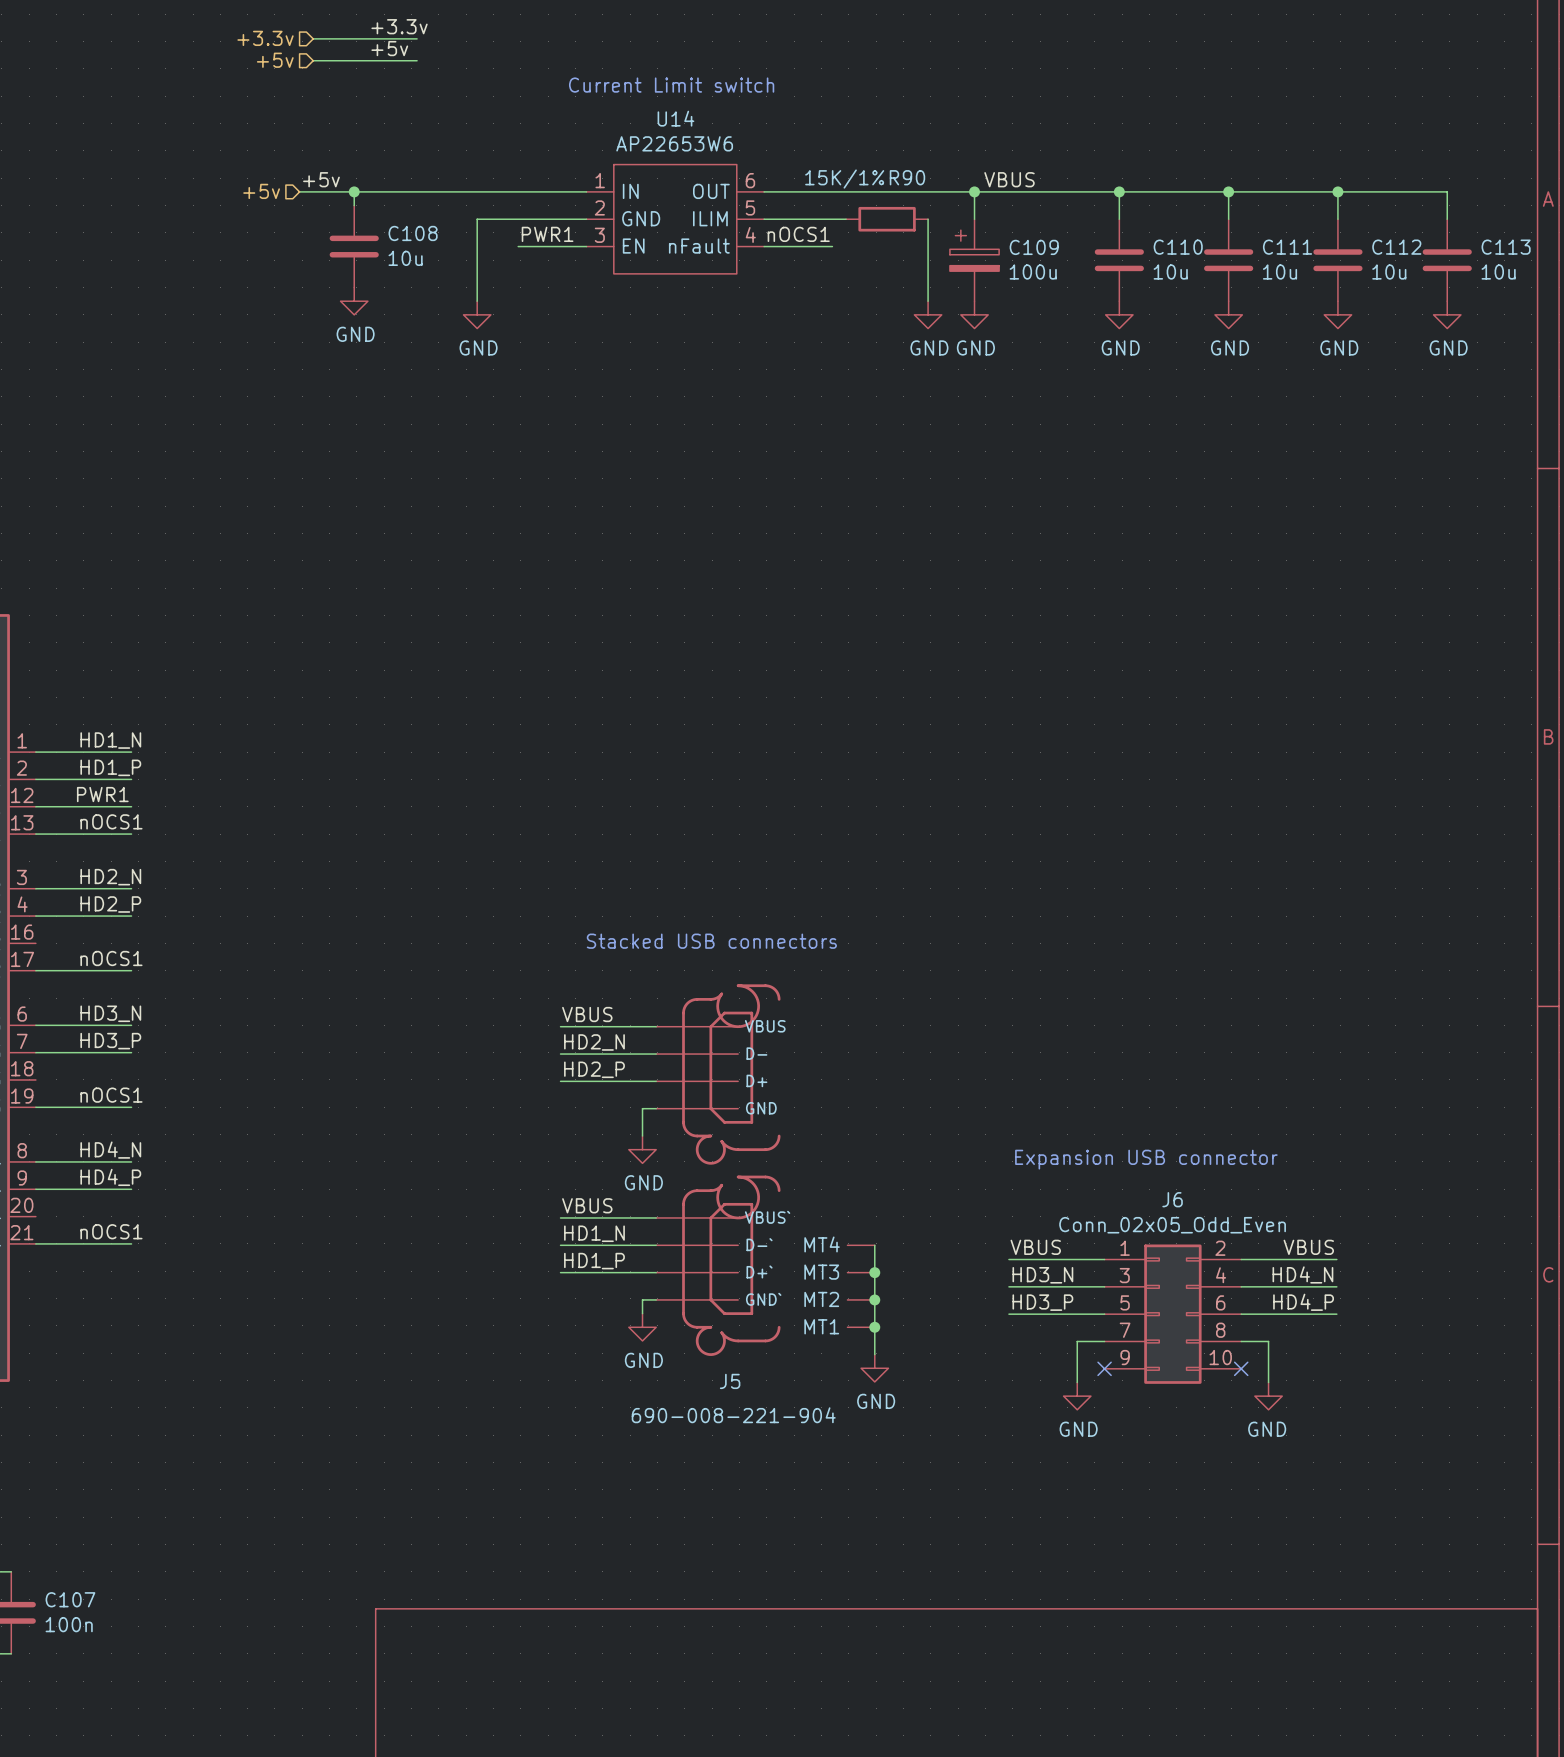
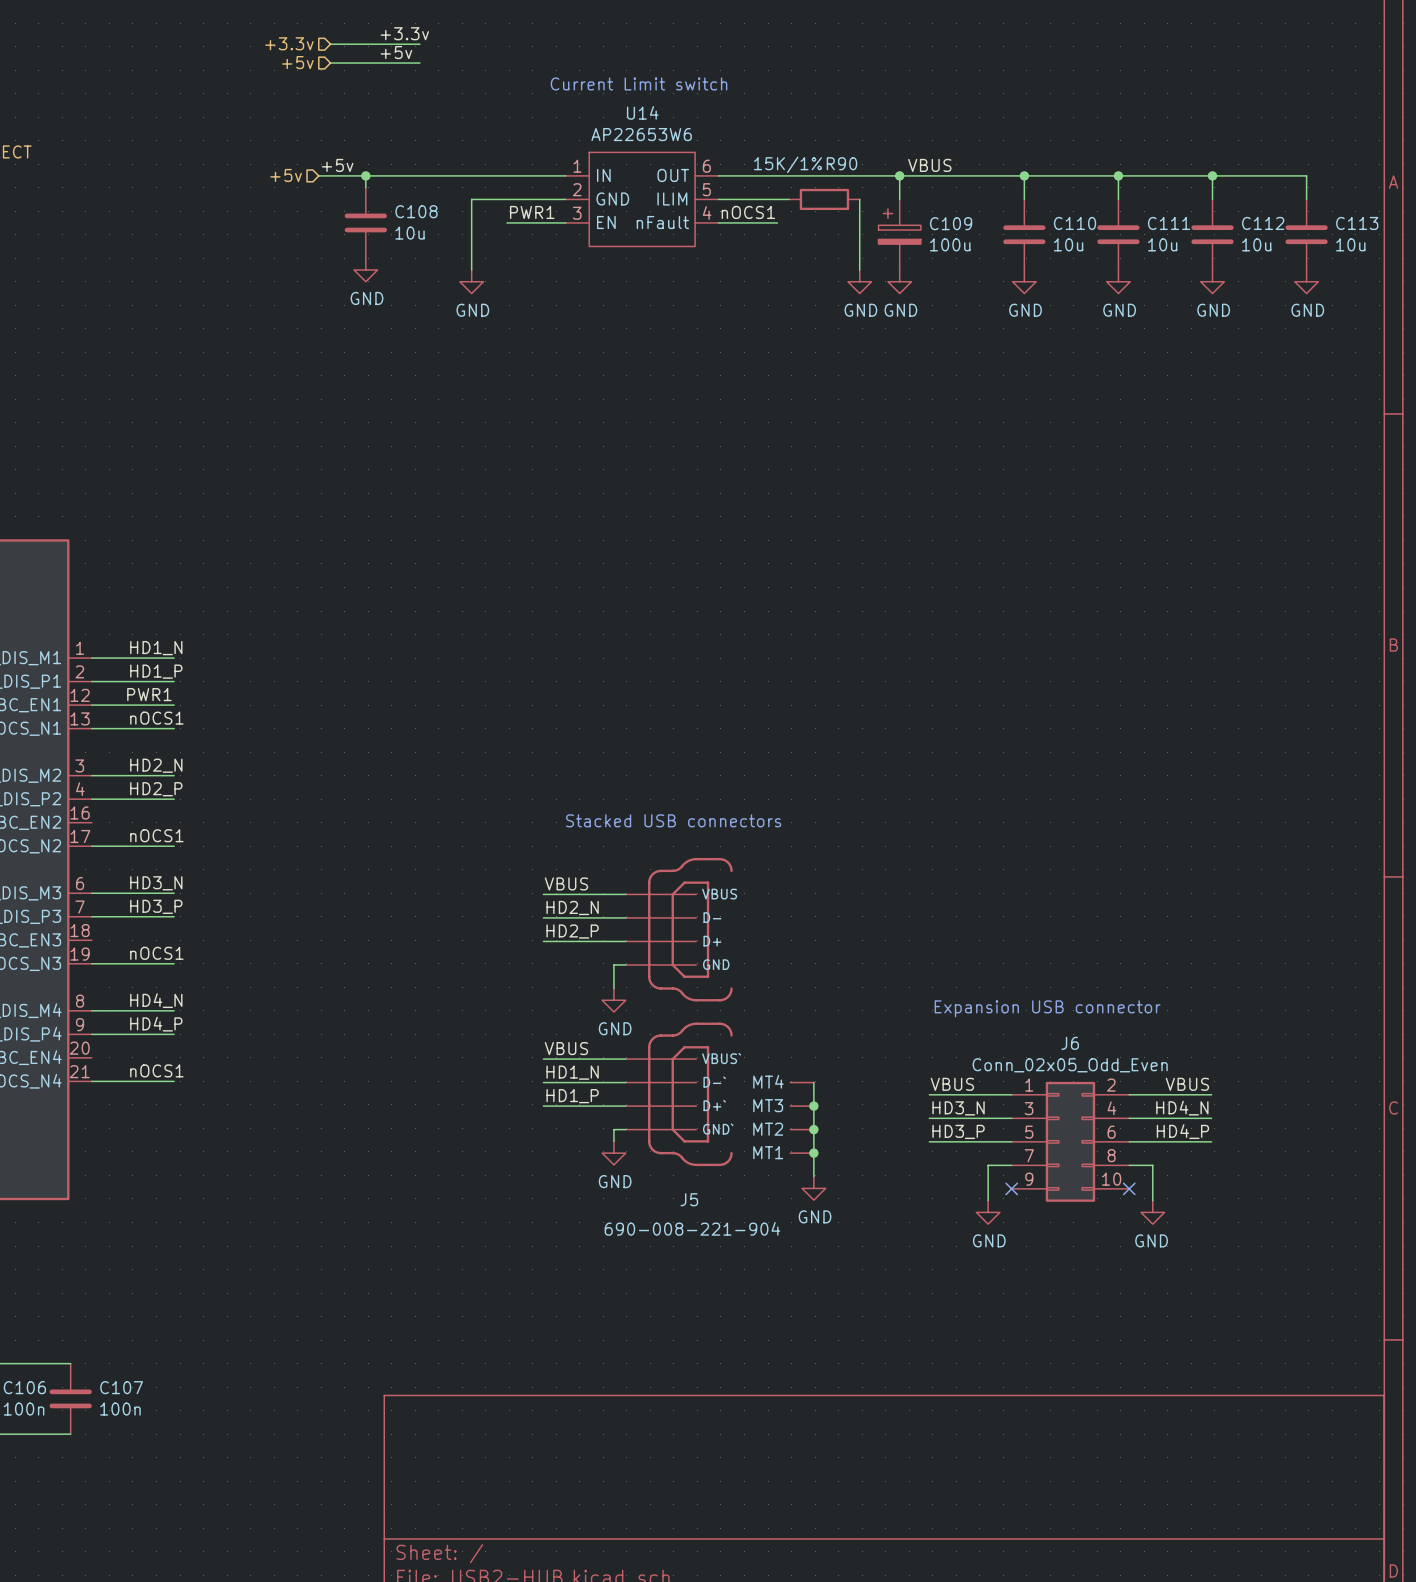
J5 symbol: [656, 984, 875, 1356] -> [625, 857, 814, 1167]

